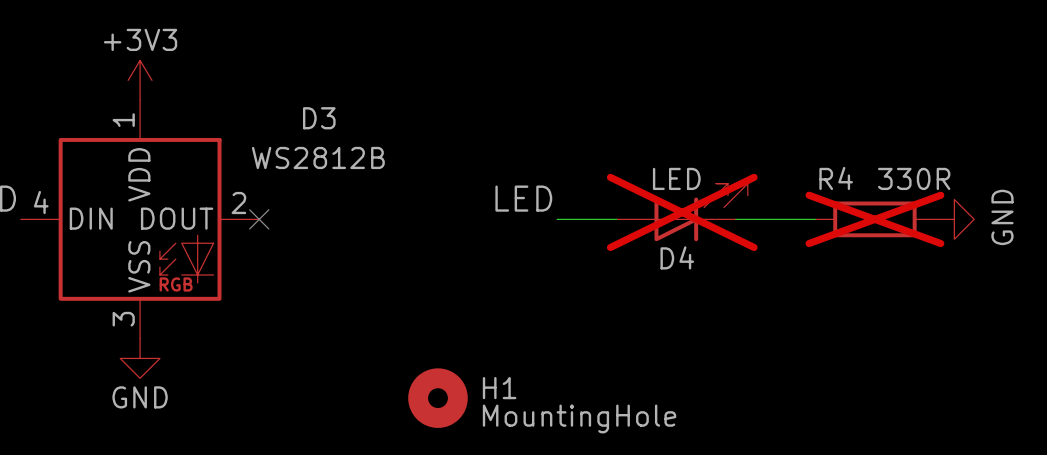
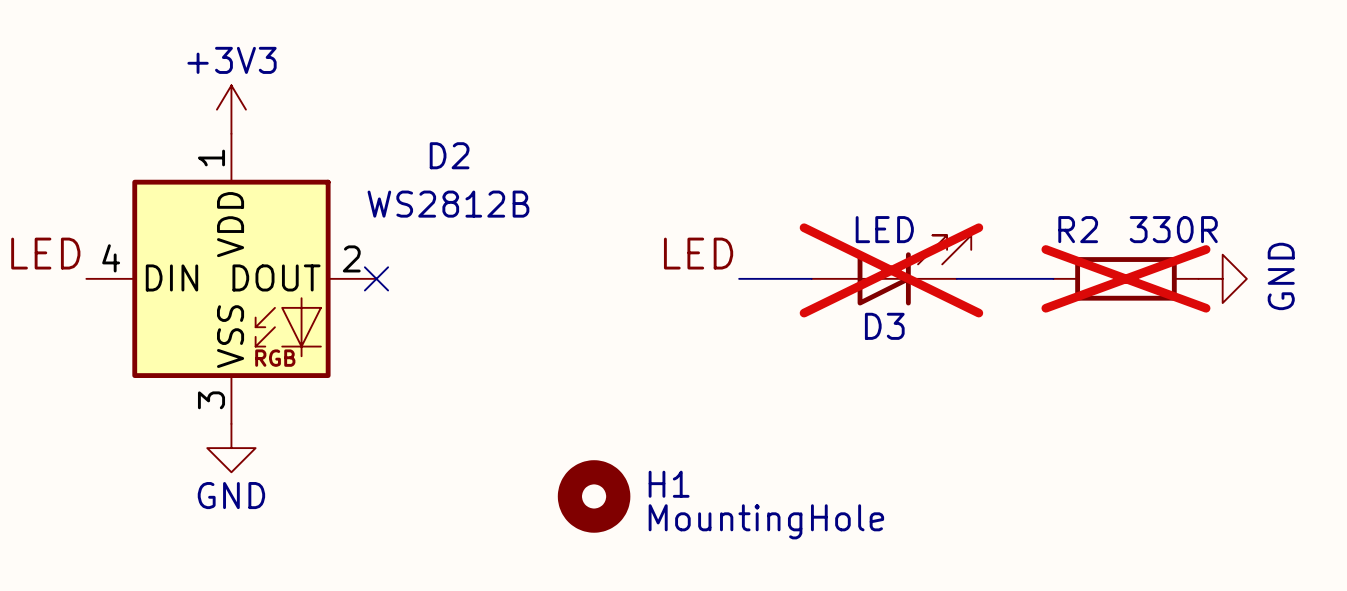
D3 name: D3 (319, 118) -> D2 (449, 155)
R4 name: R4 (836, 178) -> R2 (1078, 229)
D4 name: D4 (677, 257) -> D3 (884, 326)

